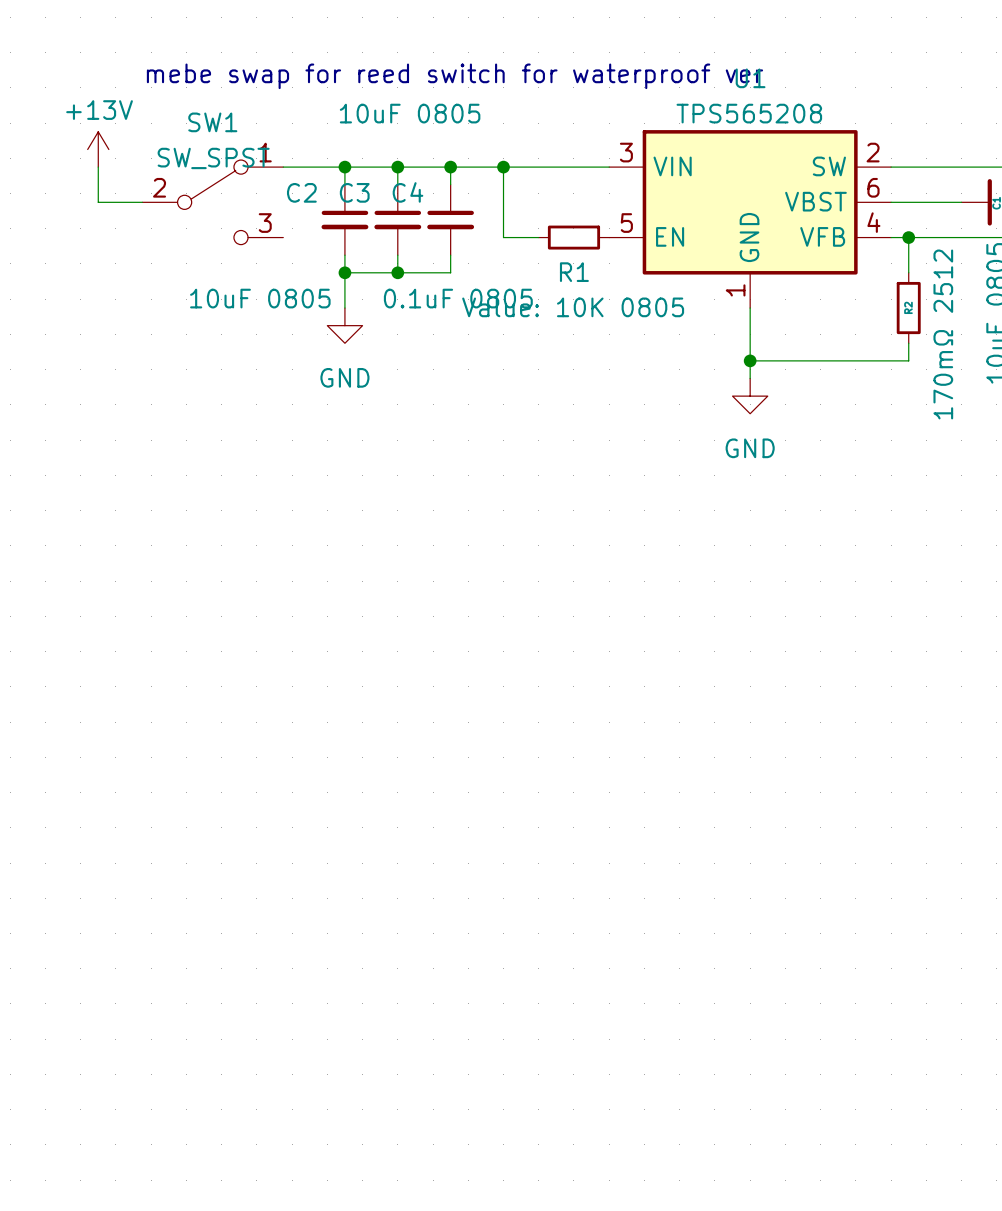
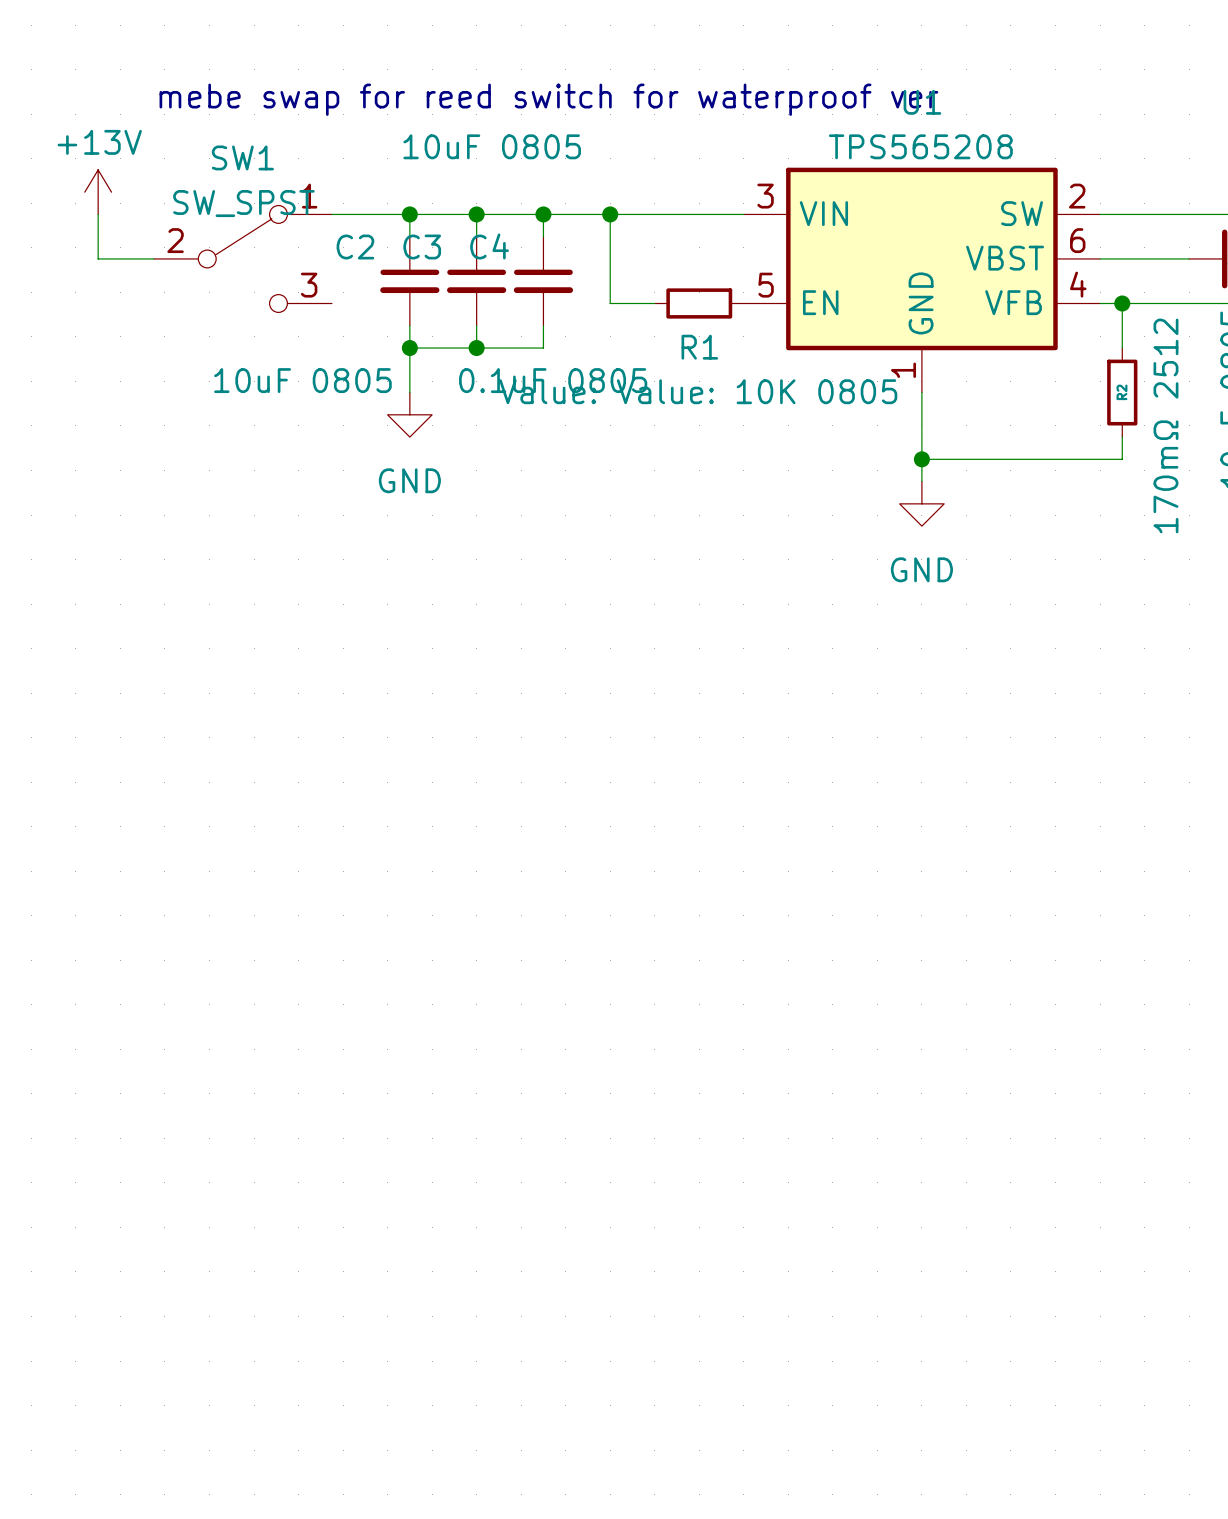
R1 value: Value: 10K 0805 (573, 307) -> Value: Value: 10K 0805 (698, 391)

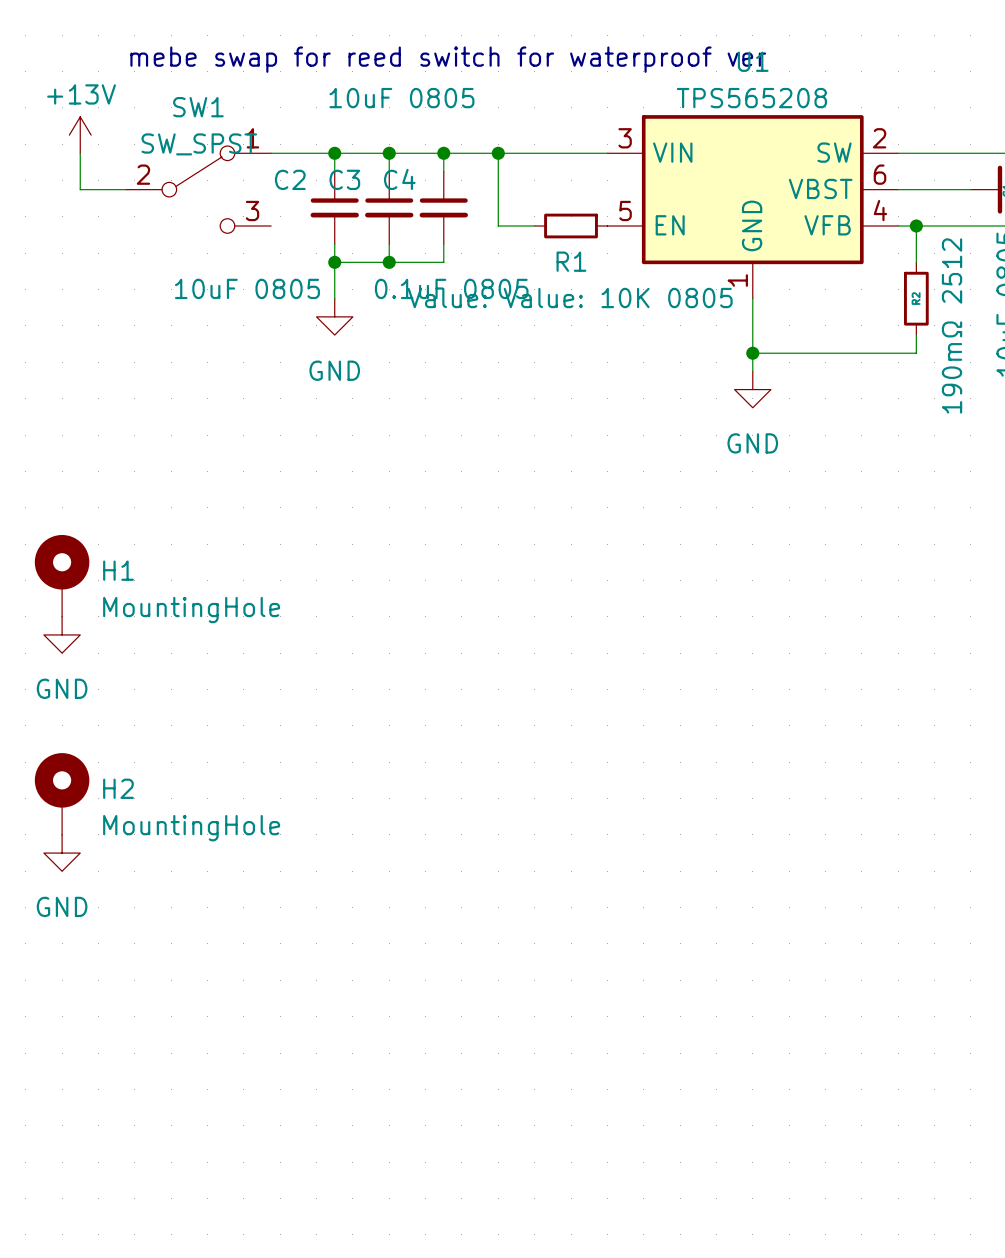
R2 value: 170mΩ 2512 (1165, 425) -> 190mΩ 2512 (952, 325)
H1: none -> MountingHole (62, 575)
power symbol: none -> GND (62, 634)
H2: none -> MountingHole (62, 793)
power symbol: none -> GND (62, 853)

